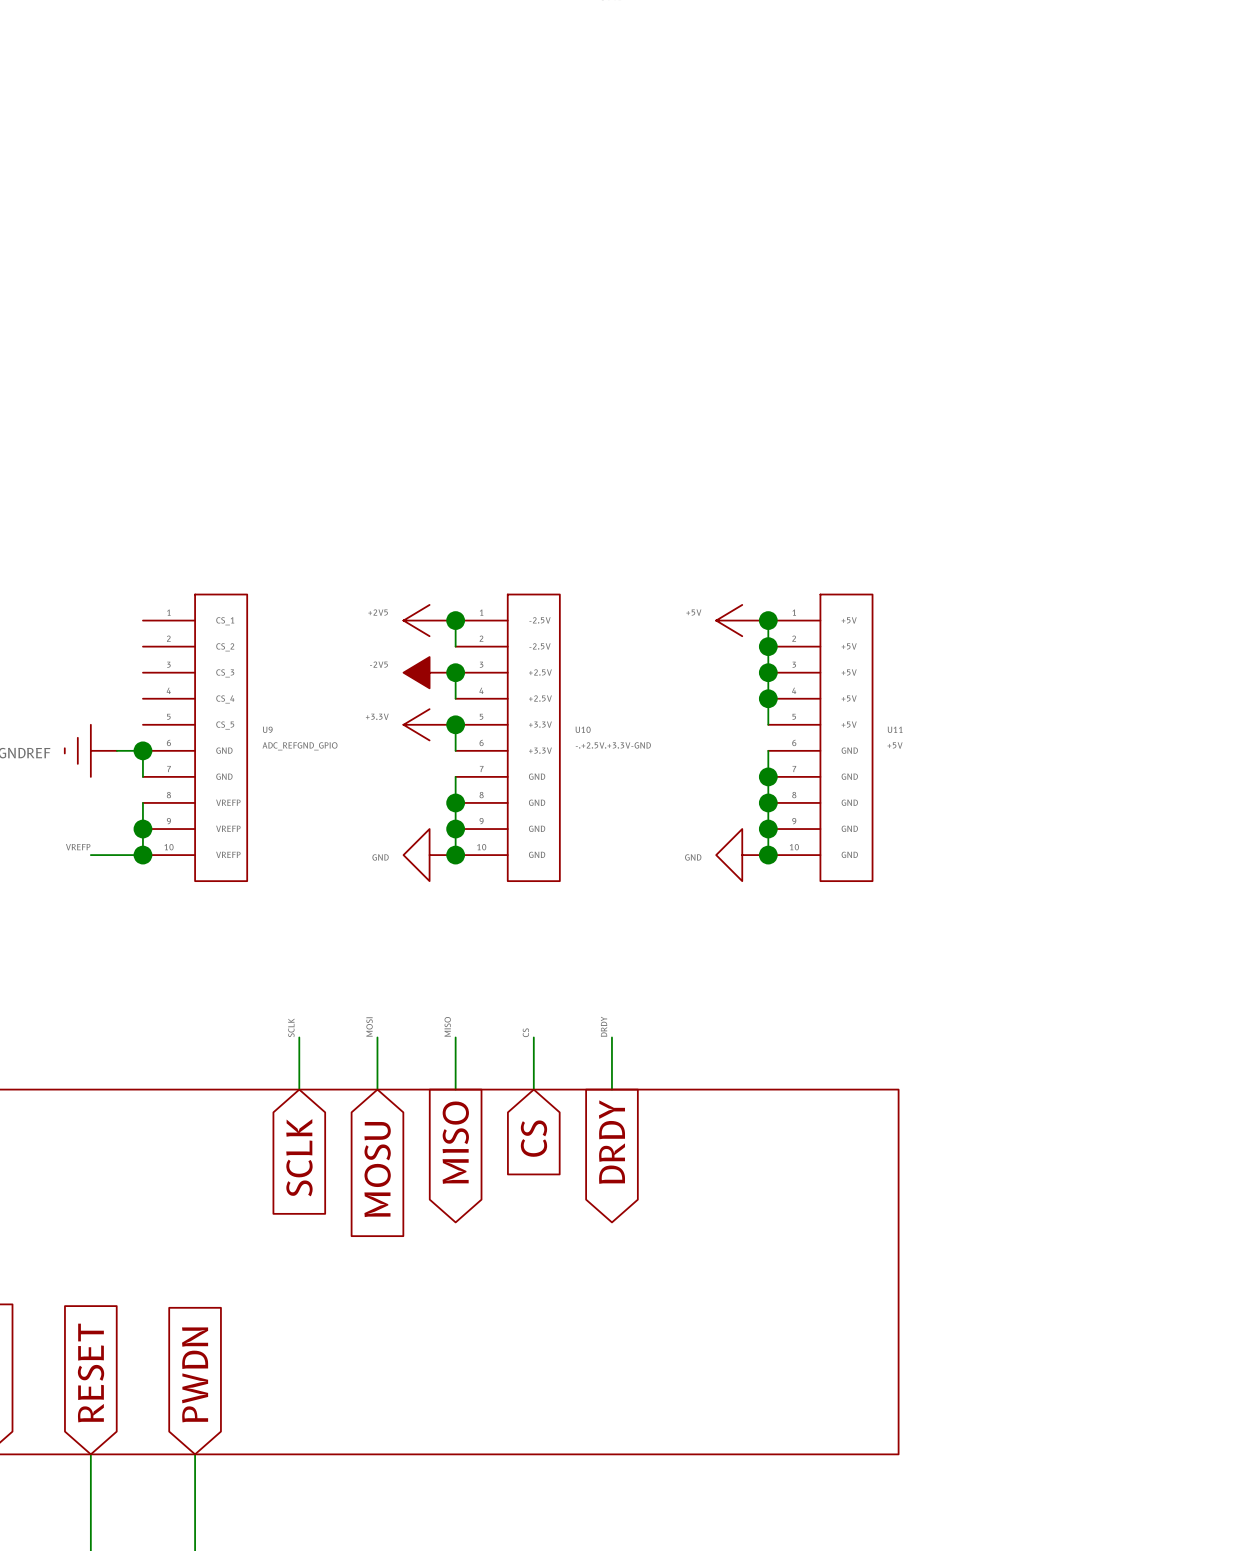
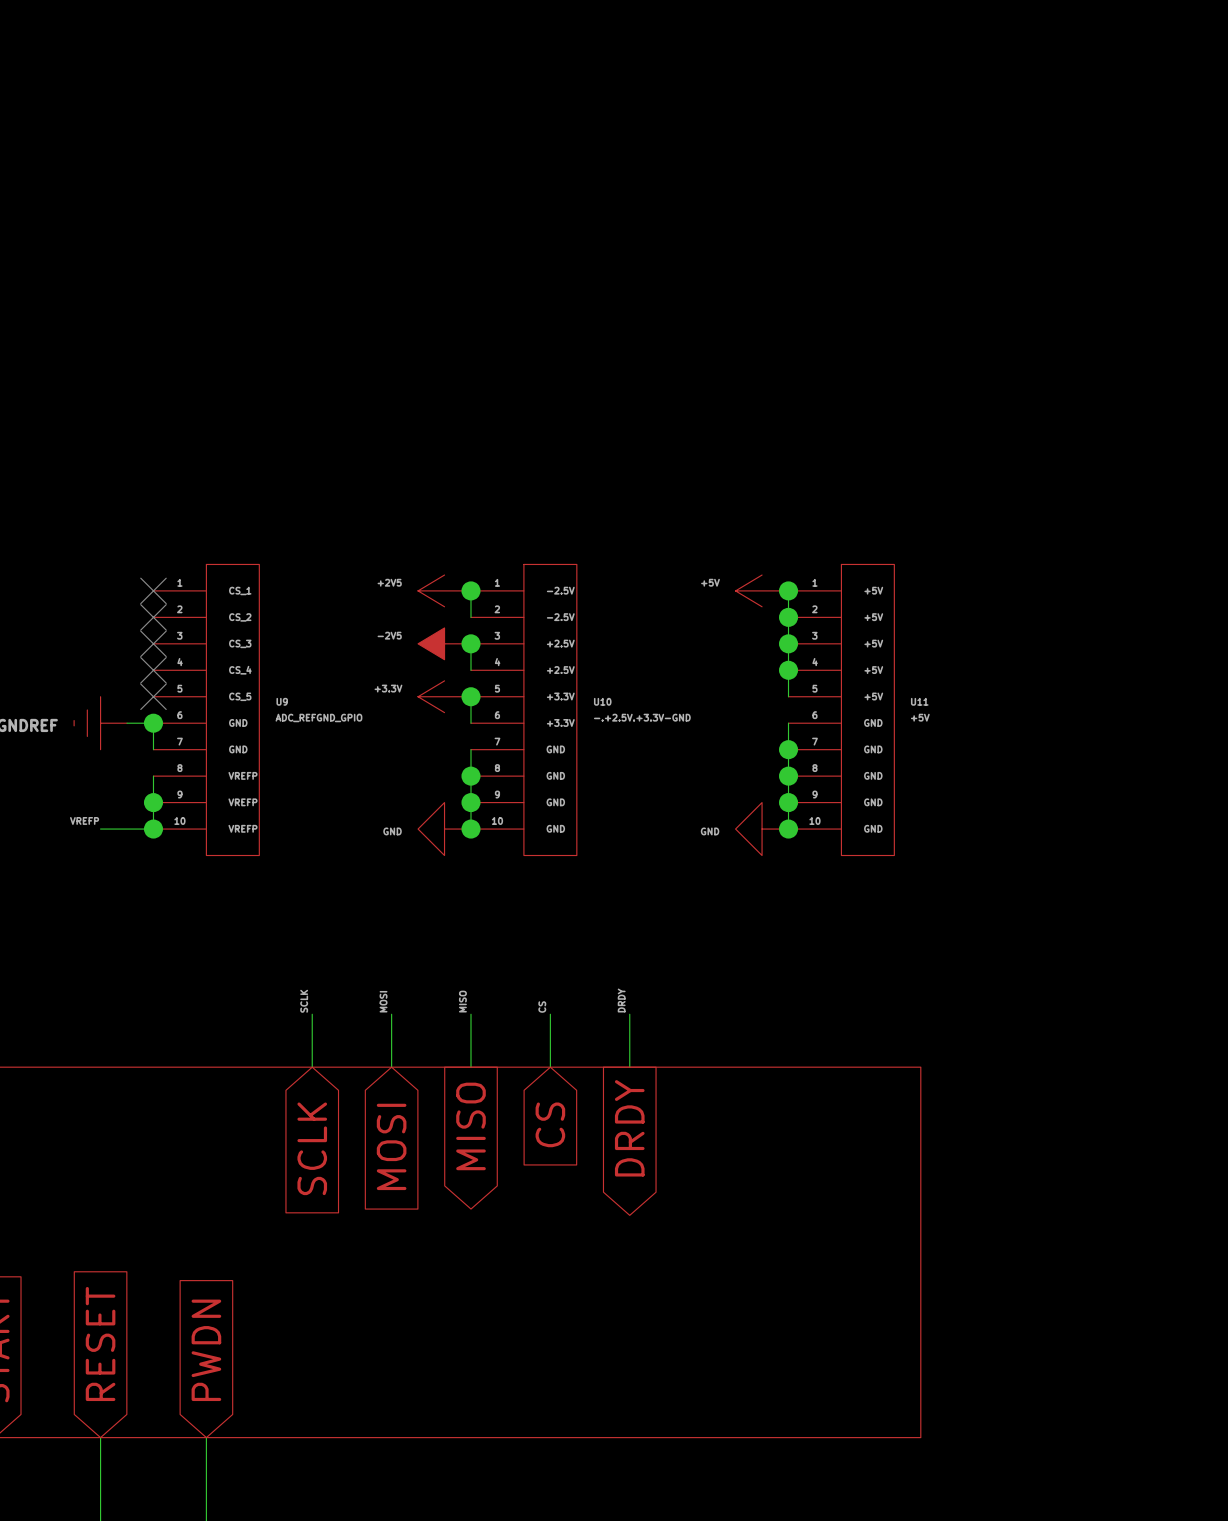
no-connect mark: none -> (153, 590)
no-connect mark: none -> (153, 617)
no-connect mark: none -> (153, 643)
no-connect mark: none -> (153, 670)
no-connect mark: none -> (153, 696)
global label: MOSU (377, 1169) -> MOSI (391, 1146)

